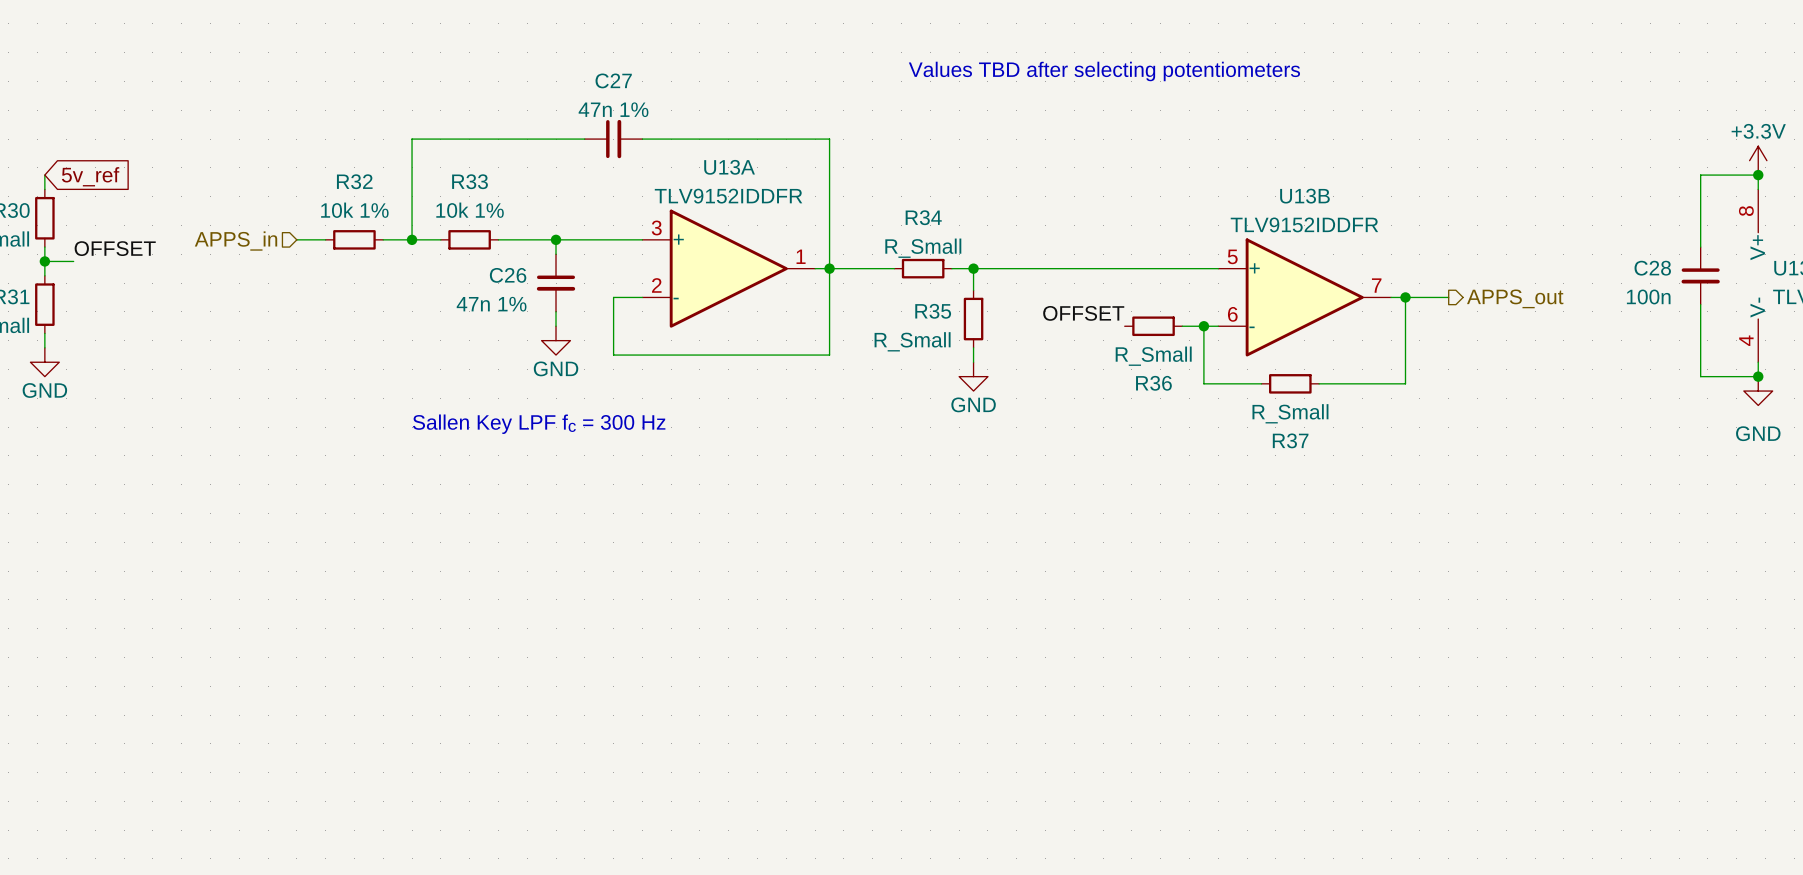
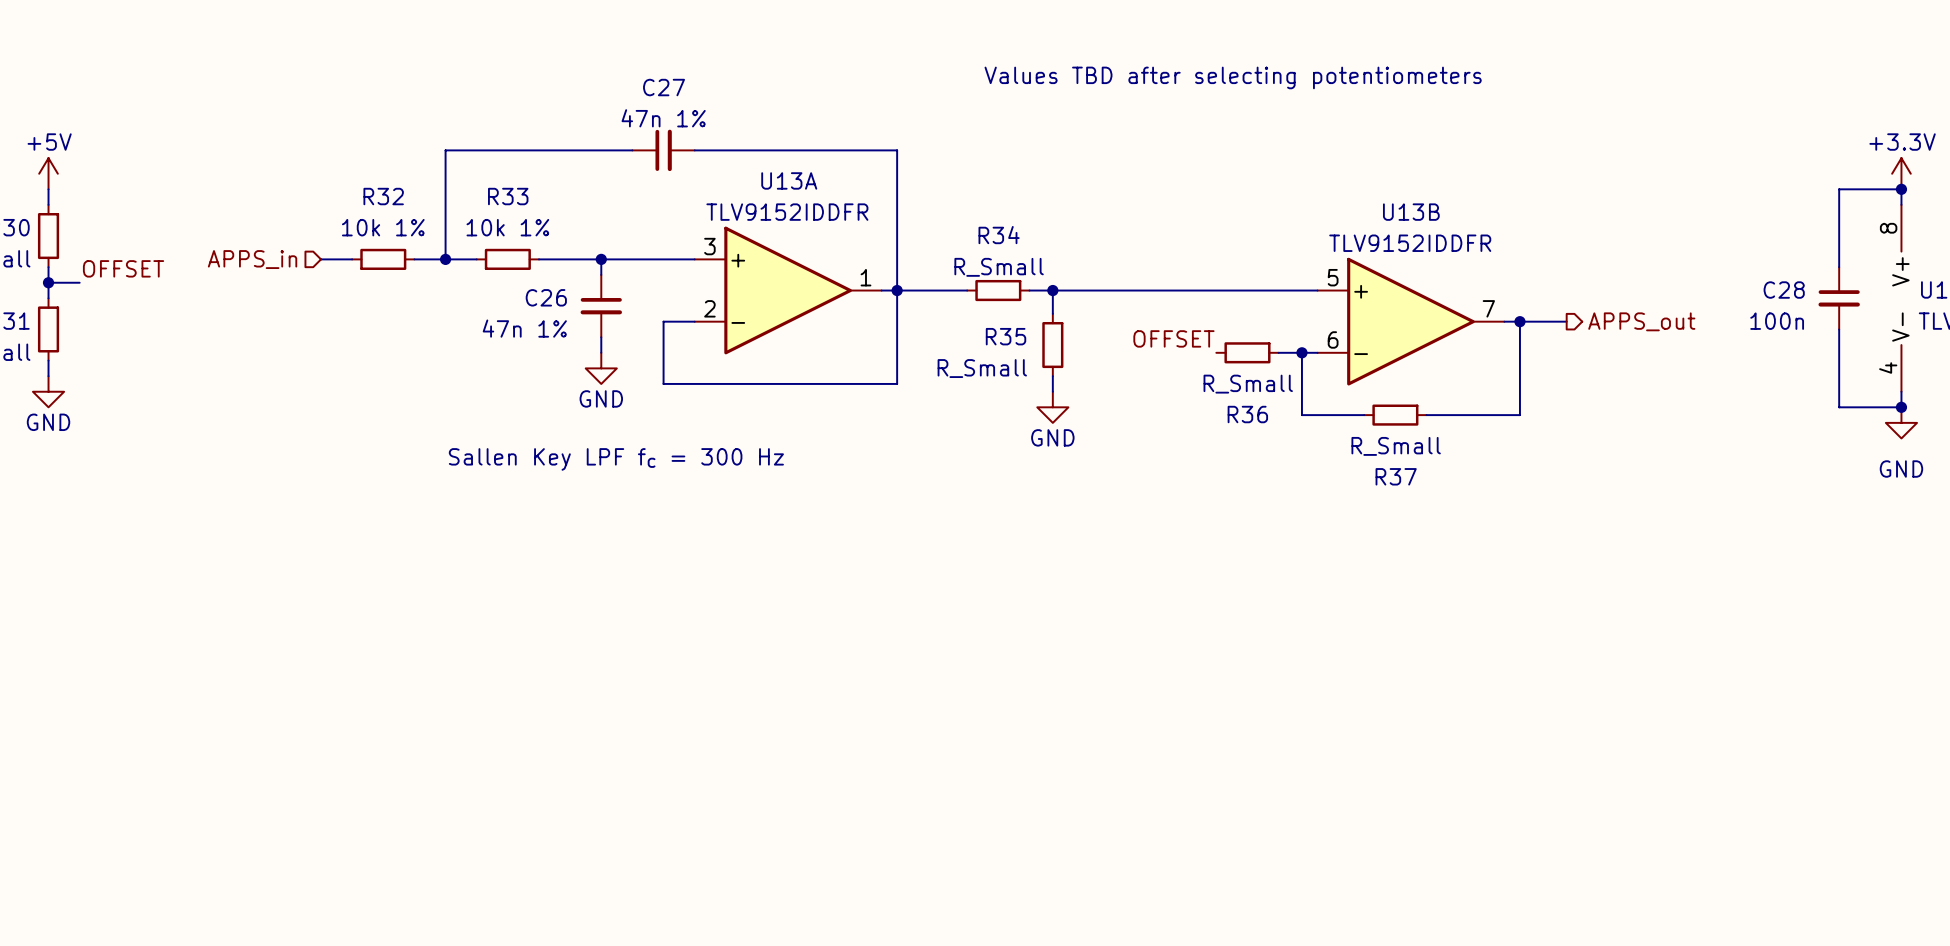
power symbol: none -> +5V (48, 173)
global label: 5v_ref (90, 176) -> none

